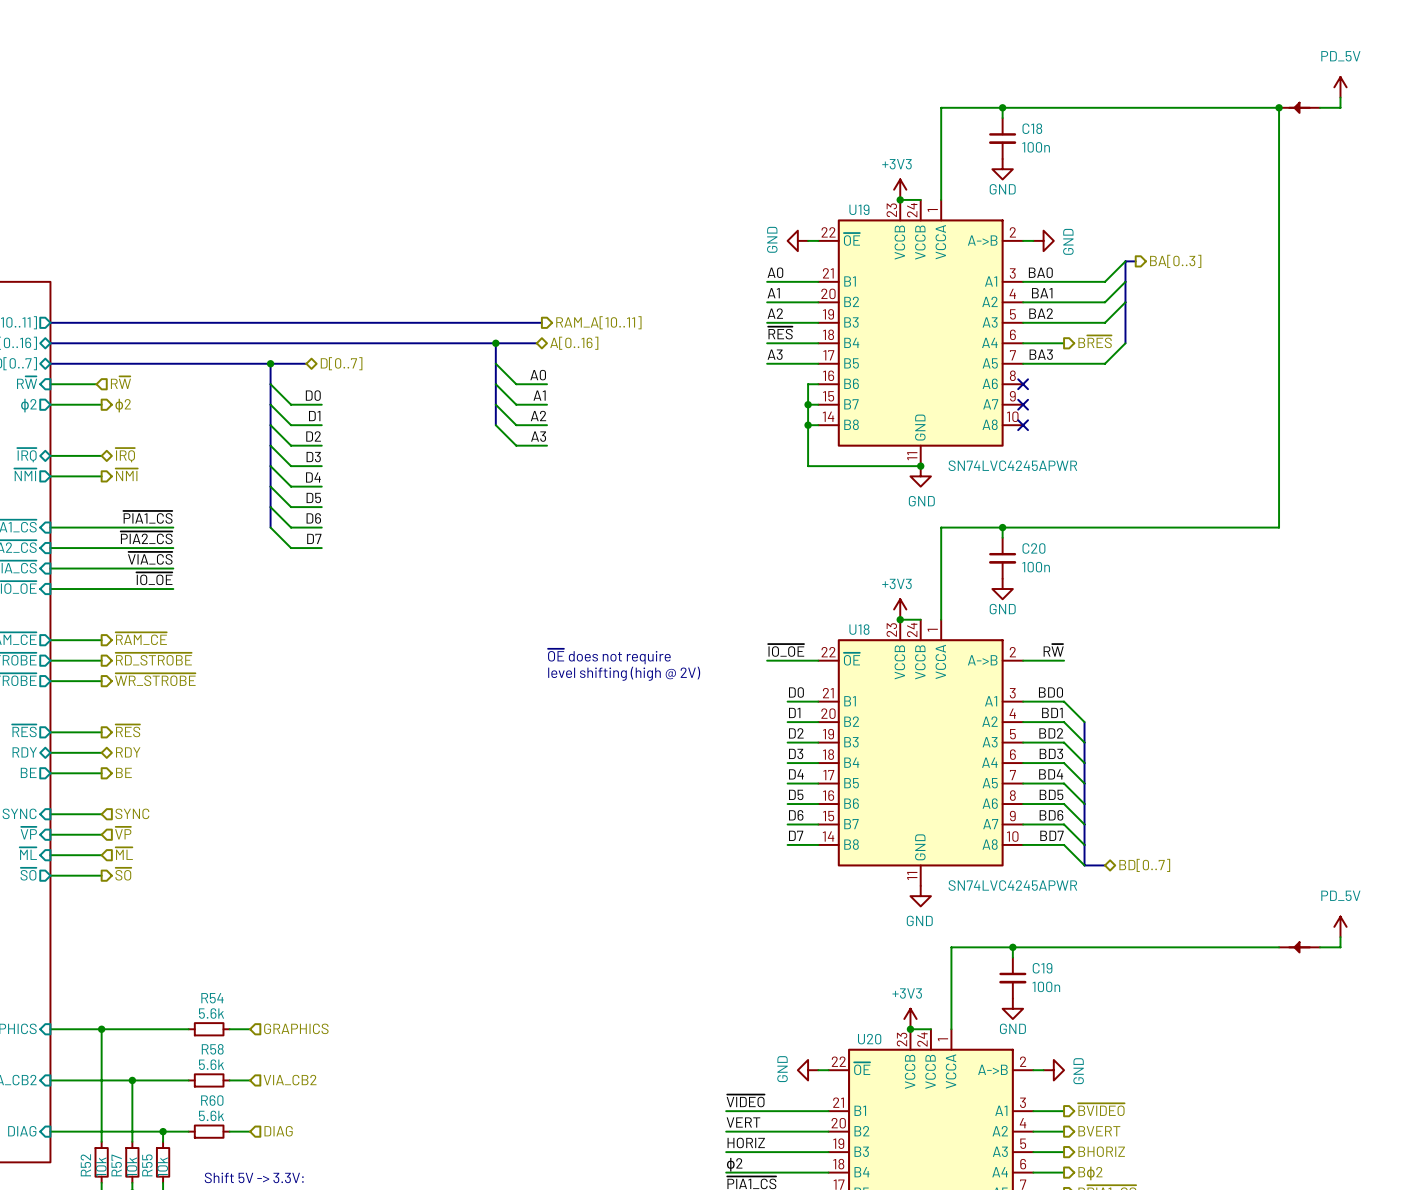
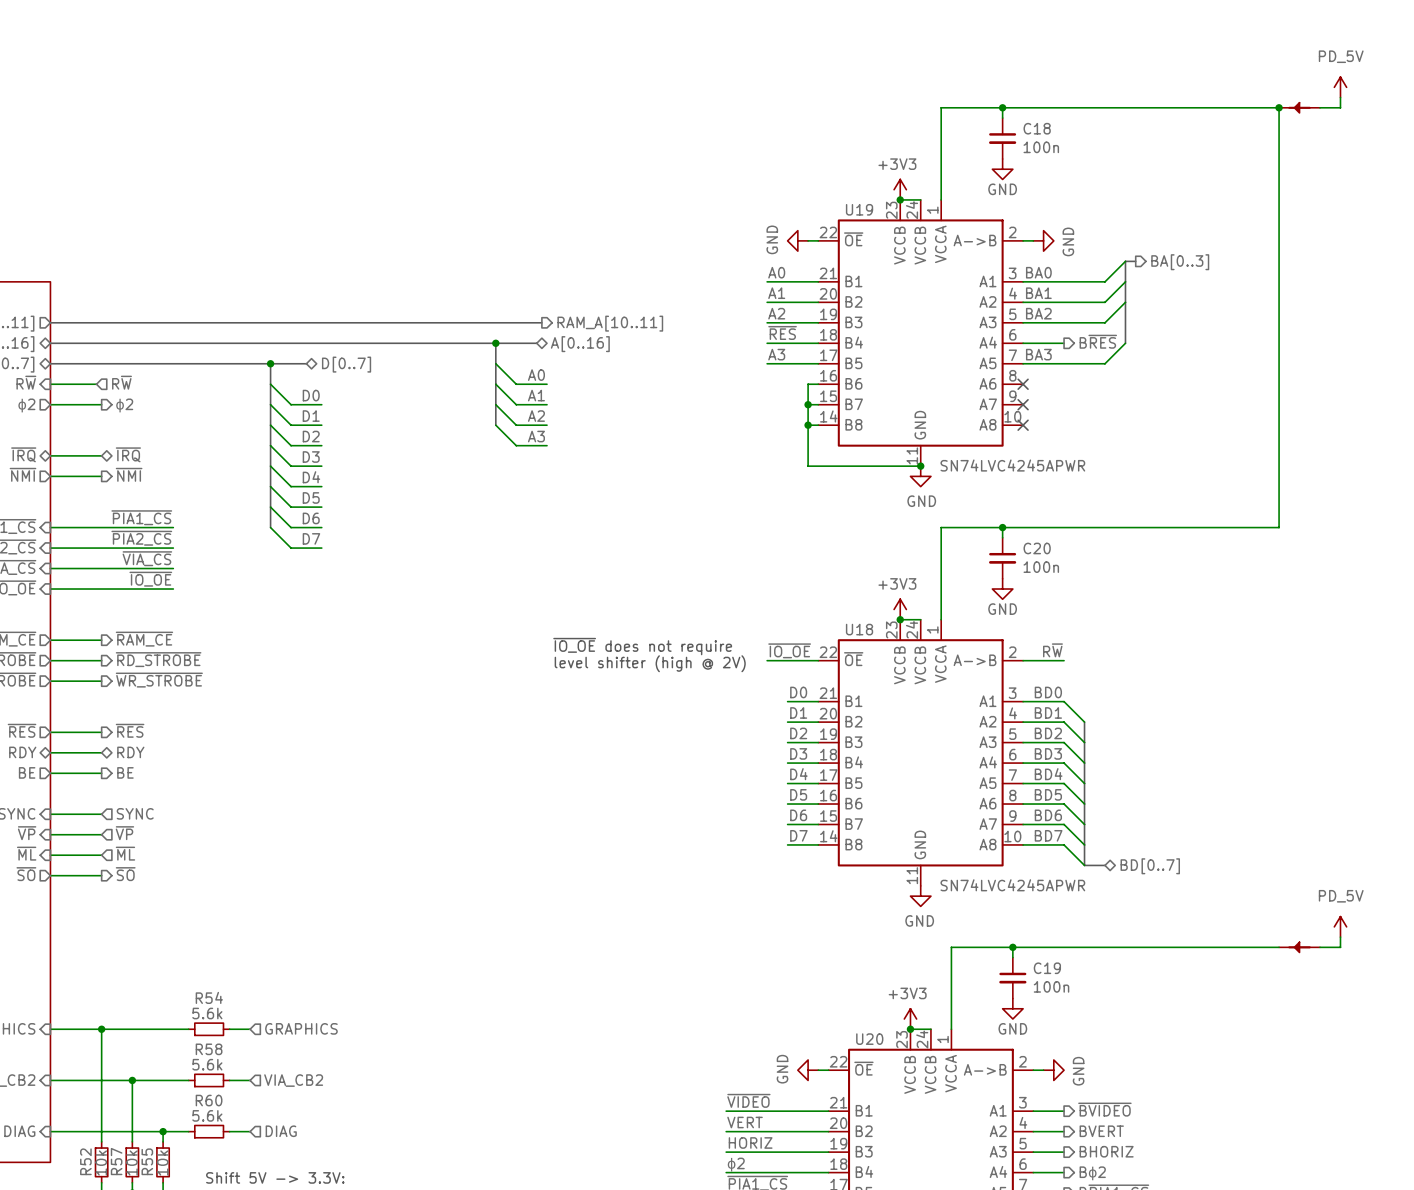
text: ~{OE} does not require (609, 656) -> ~{IO_OE} does not require (642, 646)
text: level shifting (high @ 2V) (624, 673) -> level shifter (high @ 2V) (650, 663)

